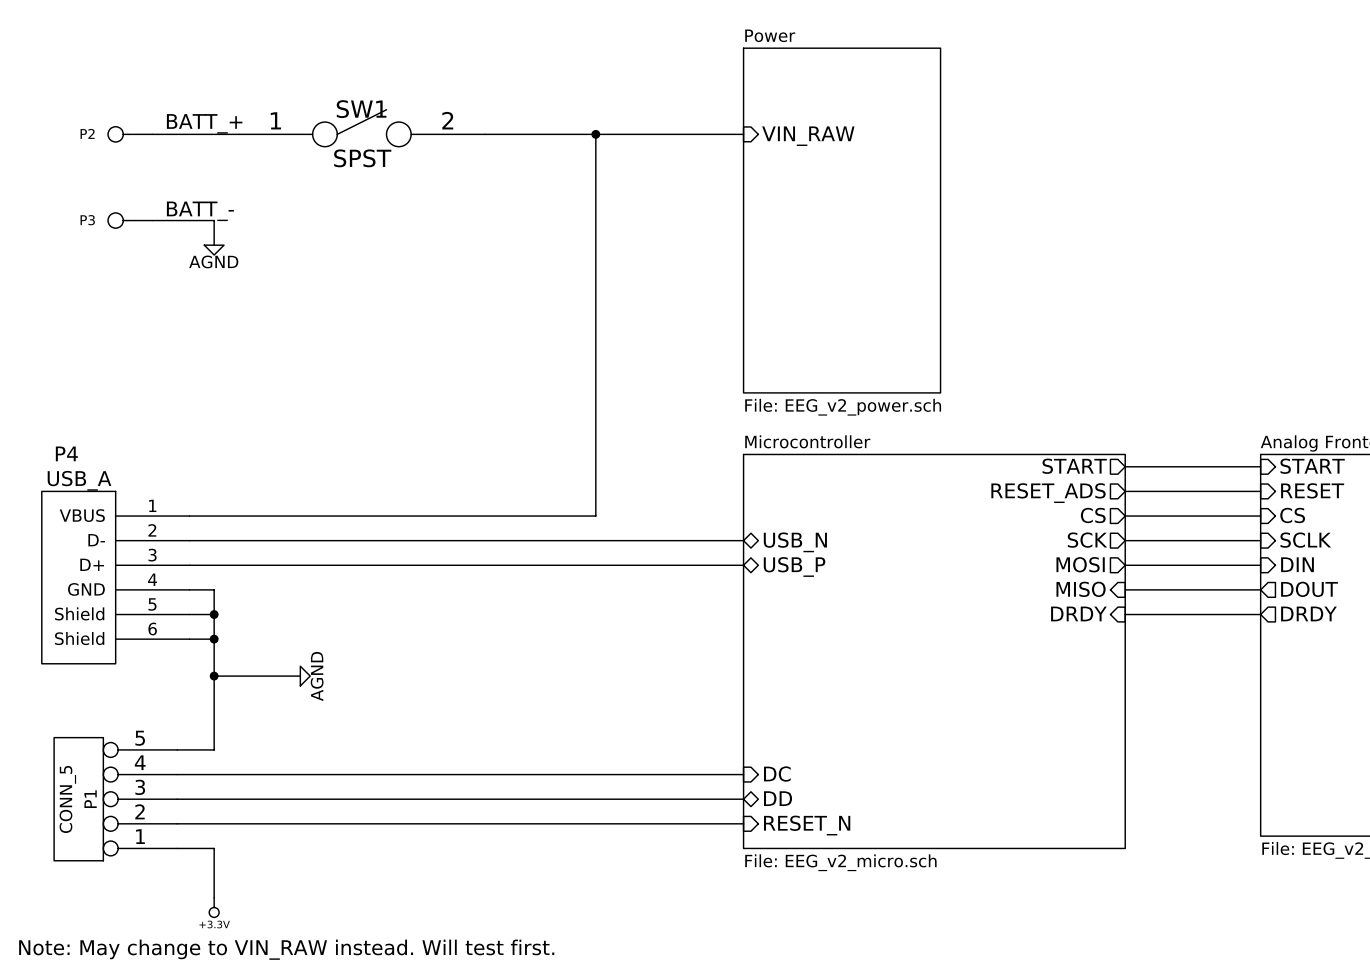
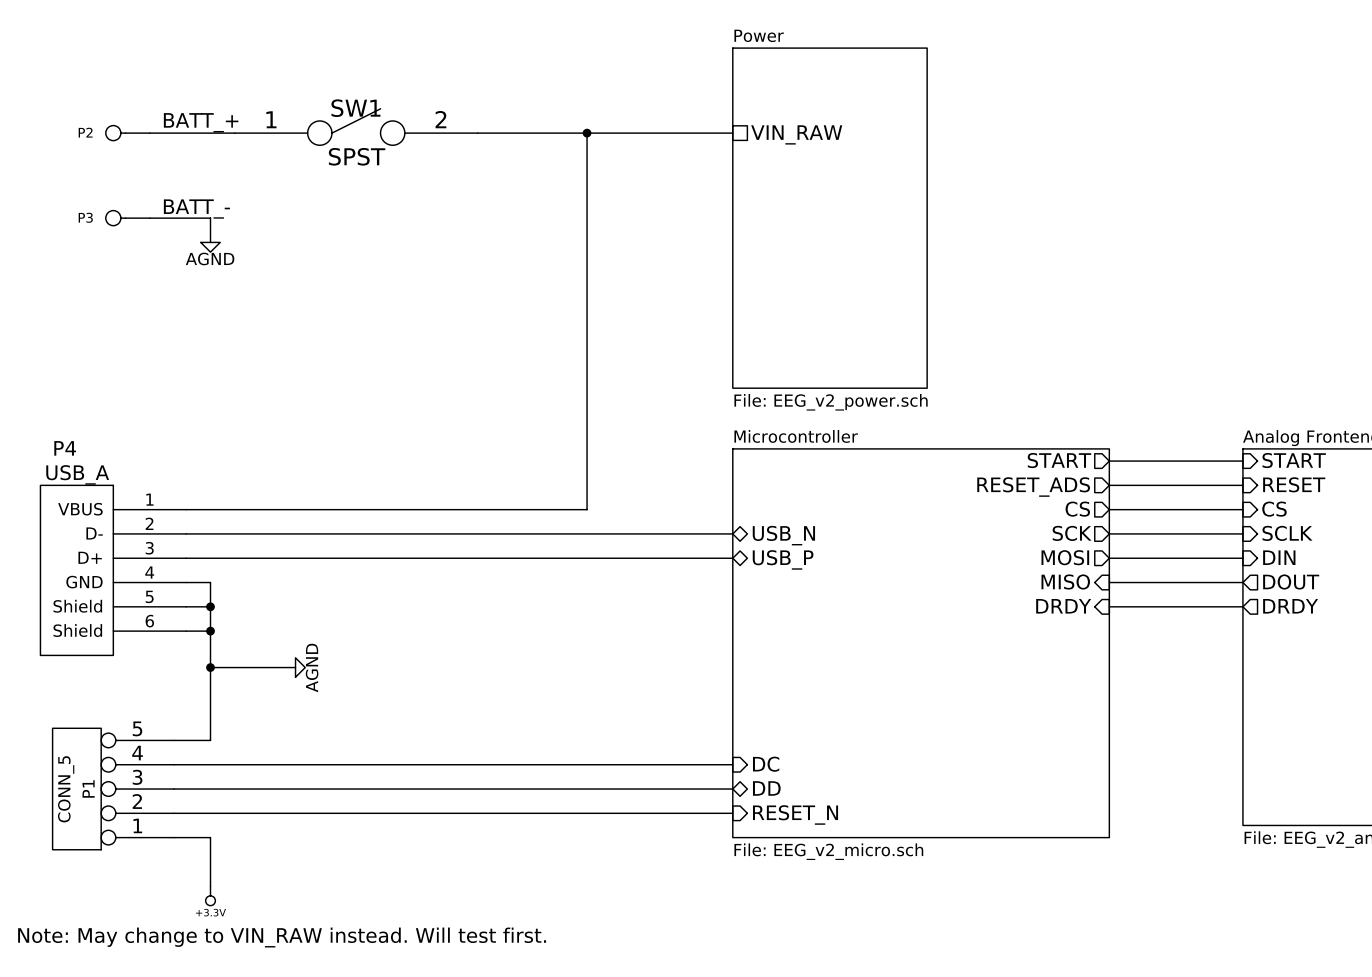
sheet pin shape: input (808, 136) -> passive (796, 134)

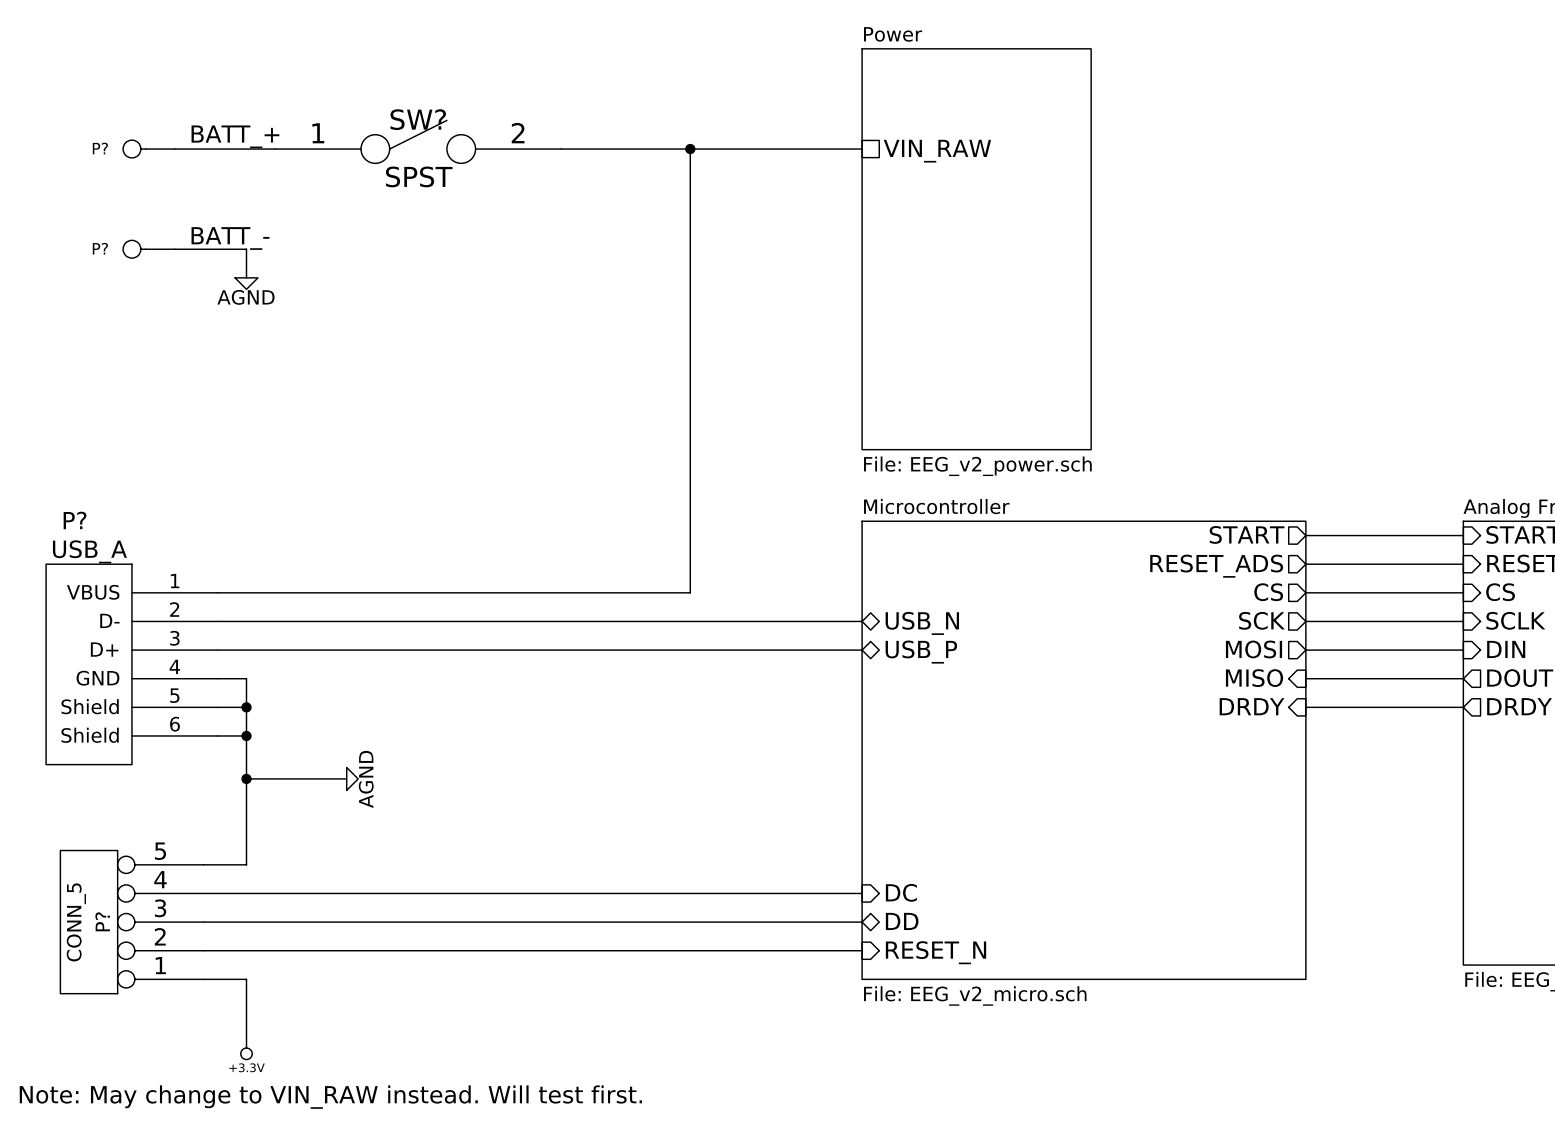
SW1 name: SW1 (355, 108) -> SW? (418, 119)
P2 name: P2 (85, 132) -> P? (100, 148)
P3 name: P3 (85, 217) -> P? (100, 248)
P4 name: P4 (65, 448) -> P? (75, 520)
P1 name: P1 (88, 788) -> P? (102, 921)

